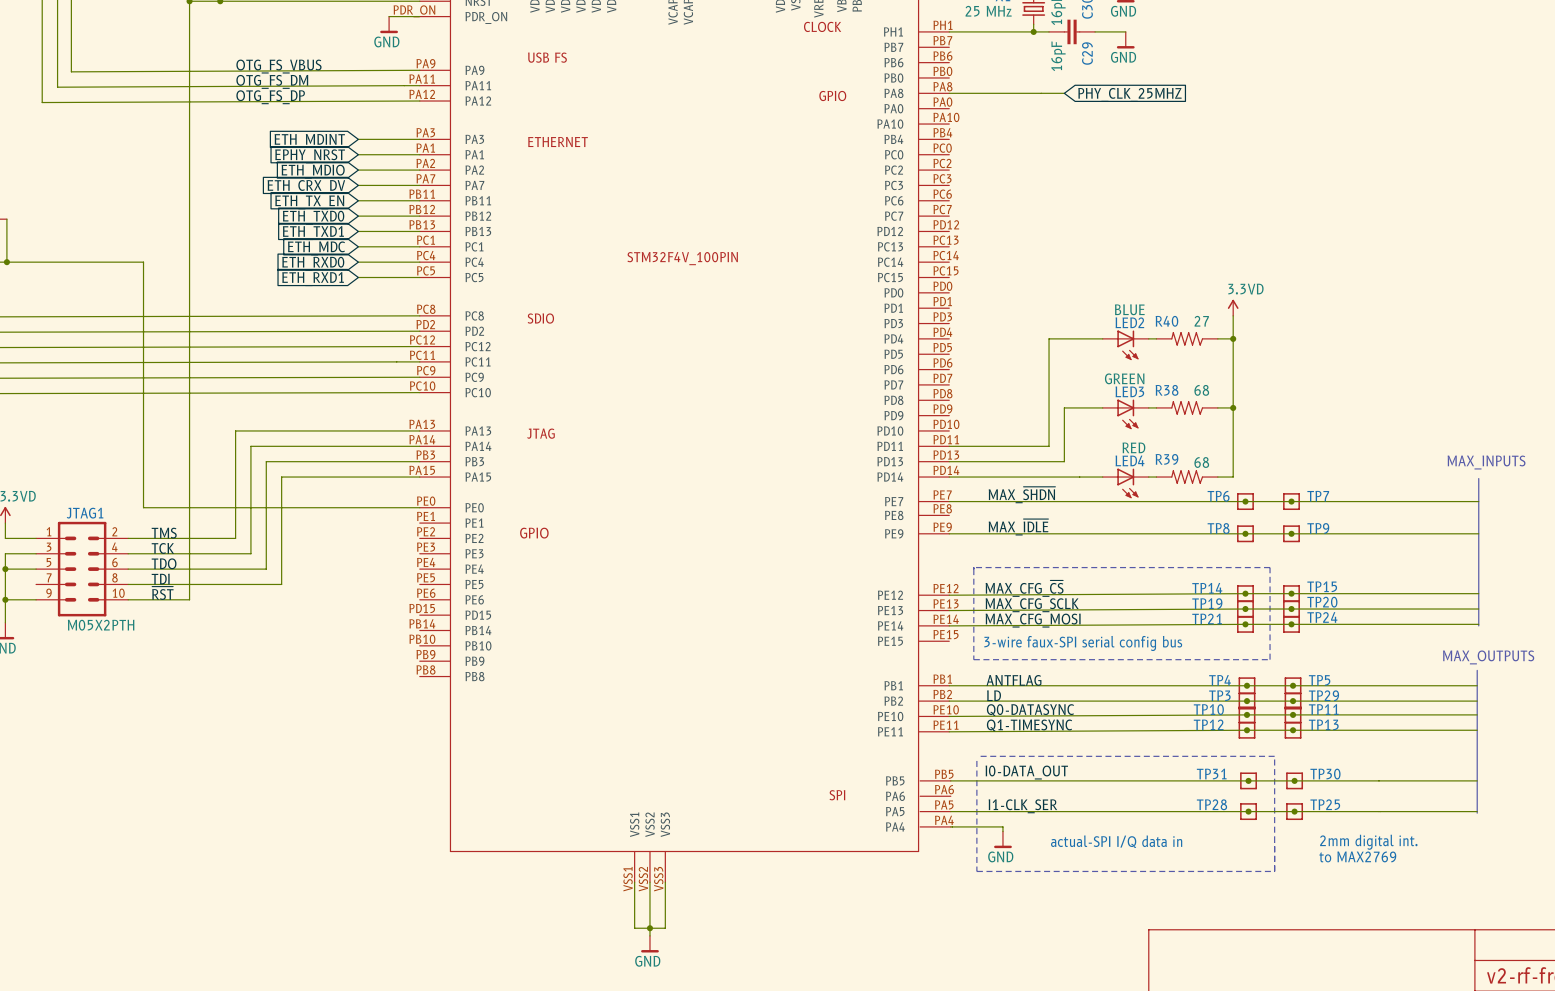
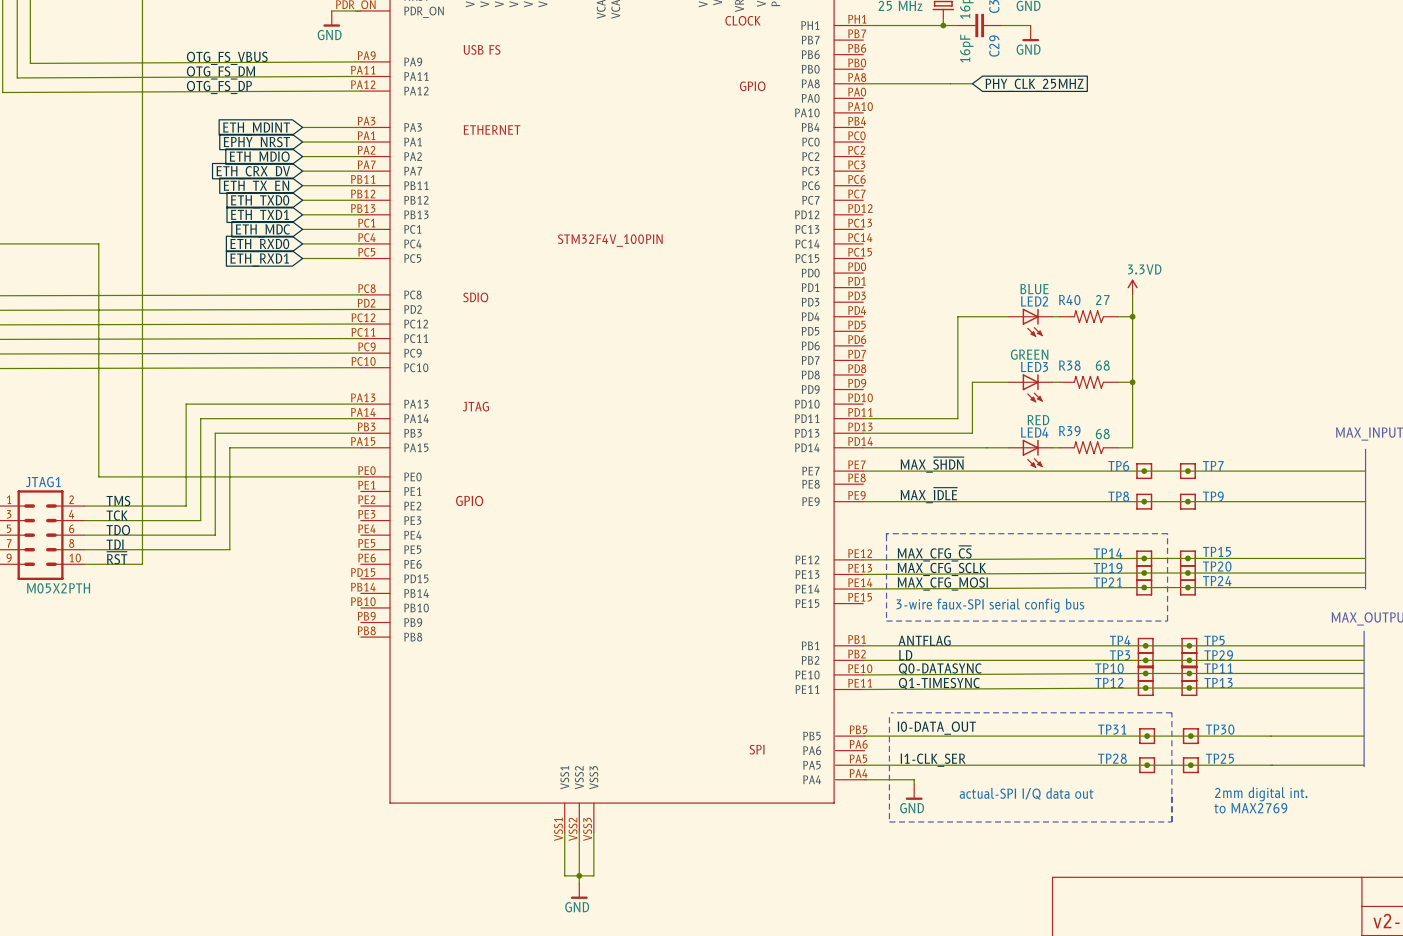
text: actual-SPI I/Q data in (1116, 841) -> actual-SPI I/Q data out (1026, 793)

